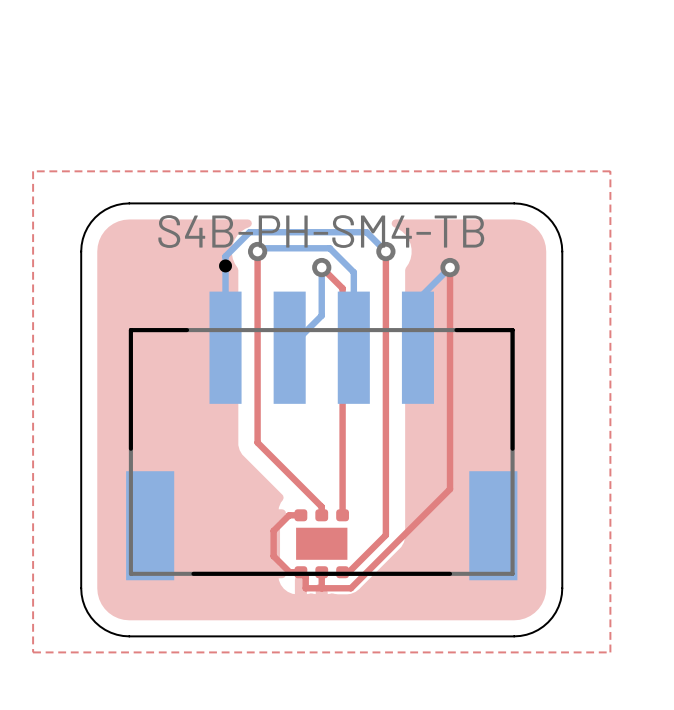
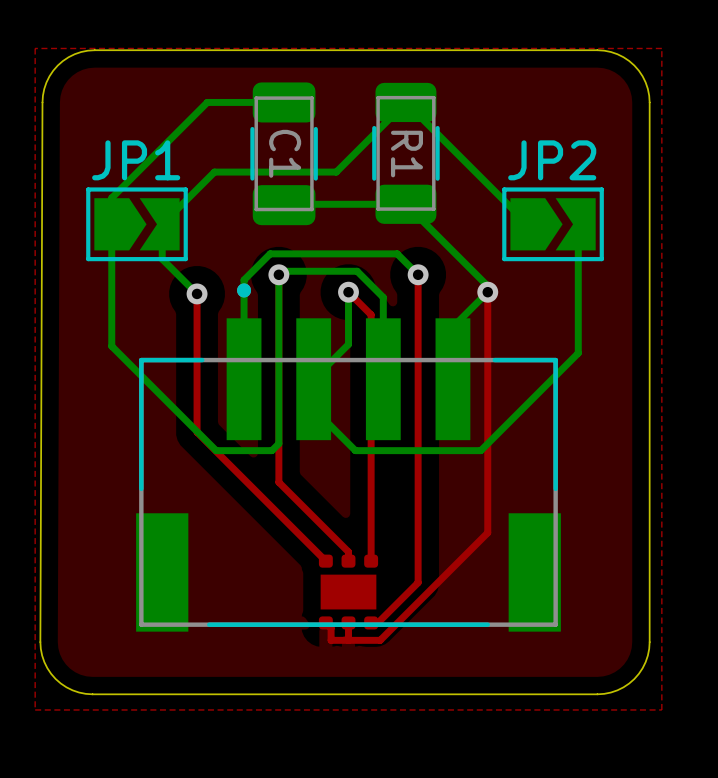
bottom track: none -> (284, 102) (207, 102) (111, 198) (111, 346) (216, 450) (271, 450) (278, 443) (278, 274)
R1: none -> (405, 153)
C1: none -> (284, 153)
top zone outline: (610, 171) (33, 171) -> (661, 187) (661, 48) (35, 48) (35, 187)
bottom track: none -> (284, 205) (405, 204) (487, 286) (487, 292)
board edge: (514, 203) (129, 203) (110, 207) (95, 217) (84, 233) (81, 251) (81, 588) (84, 606) (95, 622) (110, 632) (129, 636) (514, 636) (532, 632) (548, 622) (558, 606) (562, 588) (561, 245) (555, 227) (543, 213) (526, 205) (514, 203) -> (597, 50) (617, 54) (634, 65) (642, 76) (649, 95) (649, 642) (647, 655) (638, 673) (629, 683) (617, 690) (597, 694) (92, 694) (79, 692) (60, 683) (47, 668) (42, 655) (40, 642) (42, 102) (46, 82) (53, 70) (62, 61) (74, 54) (94, 50) (597, 50)
JP1: none -> (137, 224)
bottom track: none -> (527, 224) (405, 102) (336, 172) (214, 172) (162, 224) (162, 259) (197, 293)
JP2: none -> (553, 224)
bottom track: none -> (578, 224) (578, 353) (480, 450) (355, 450) (313, 408) (313, 379)
part value: S4B-PH-SM4-TB (321, 231) -> none
via: none -> (197, 293)
top track: (300, 515) (289, 515) (273, 530) (273, 556) (289, 572) (300, 572) -> (325, 561) (197, 432) (197, 293)

